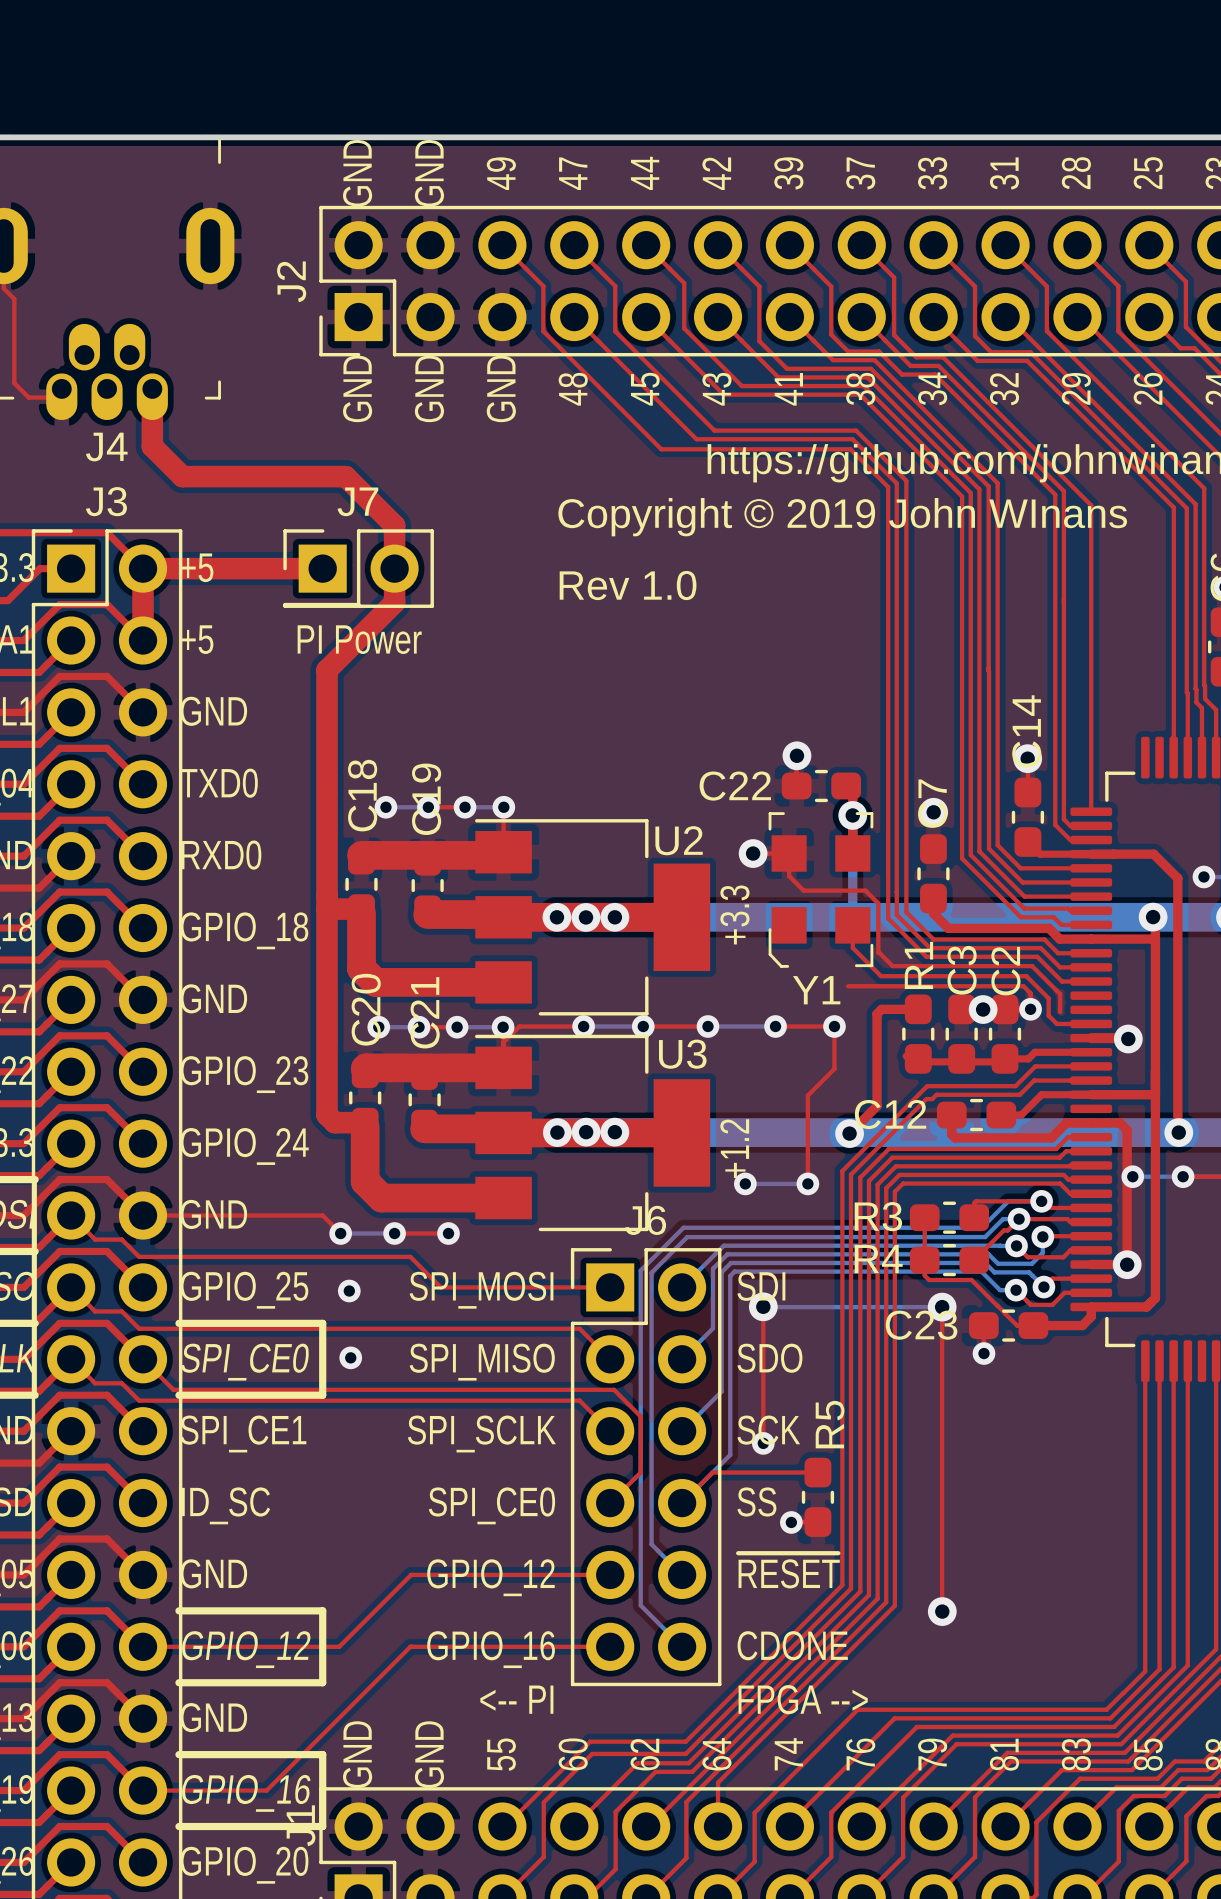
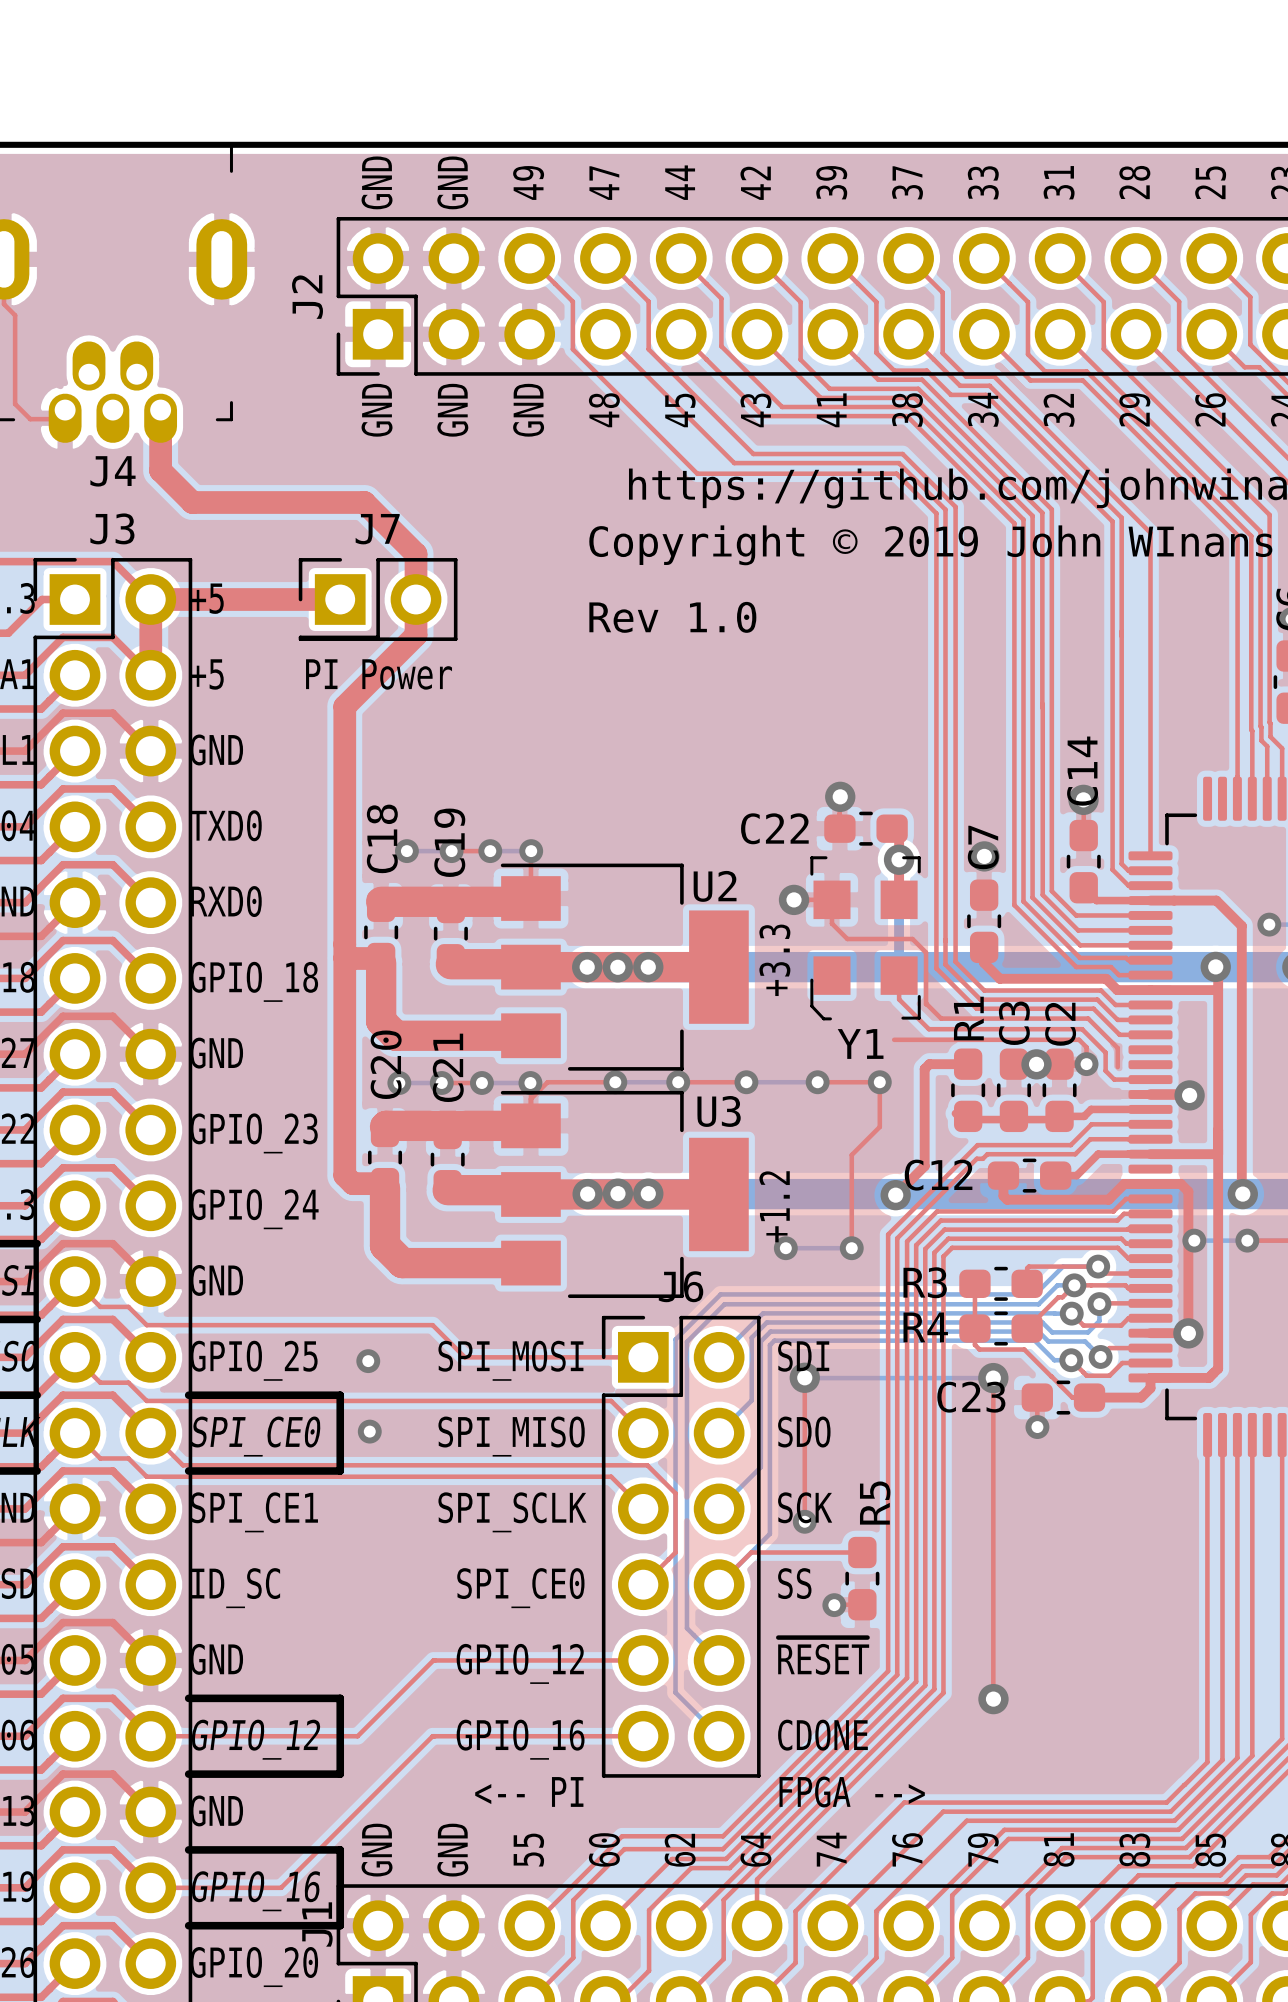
top track: (143, 1215) (322, 1215) (340, 1233) -> none
bottom track: (340, 1233) (394, 1233) -> none
via: (340, 1233) -> none
top track: (394, 1233) (448, 1233) -> none
via: (394, 1233) -> none
via: (448, 1233) -> none

